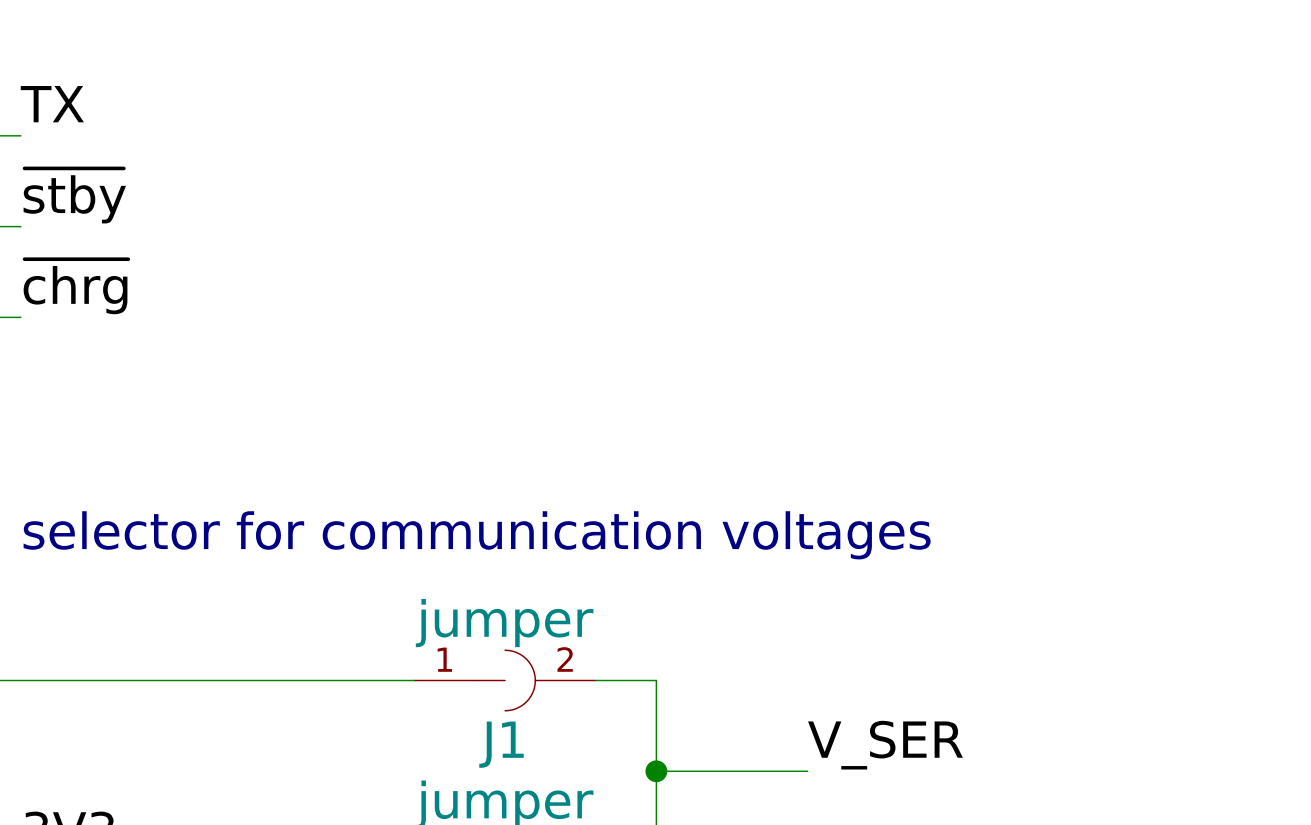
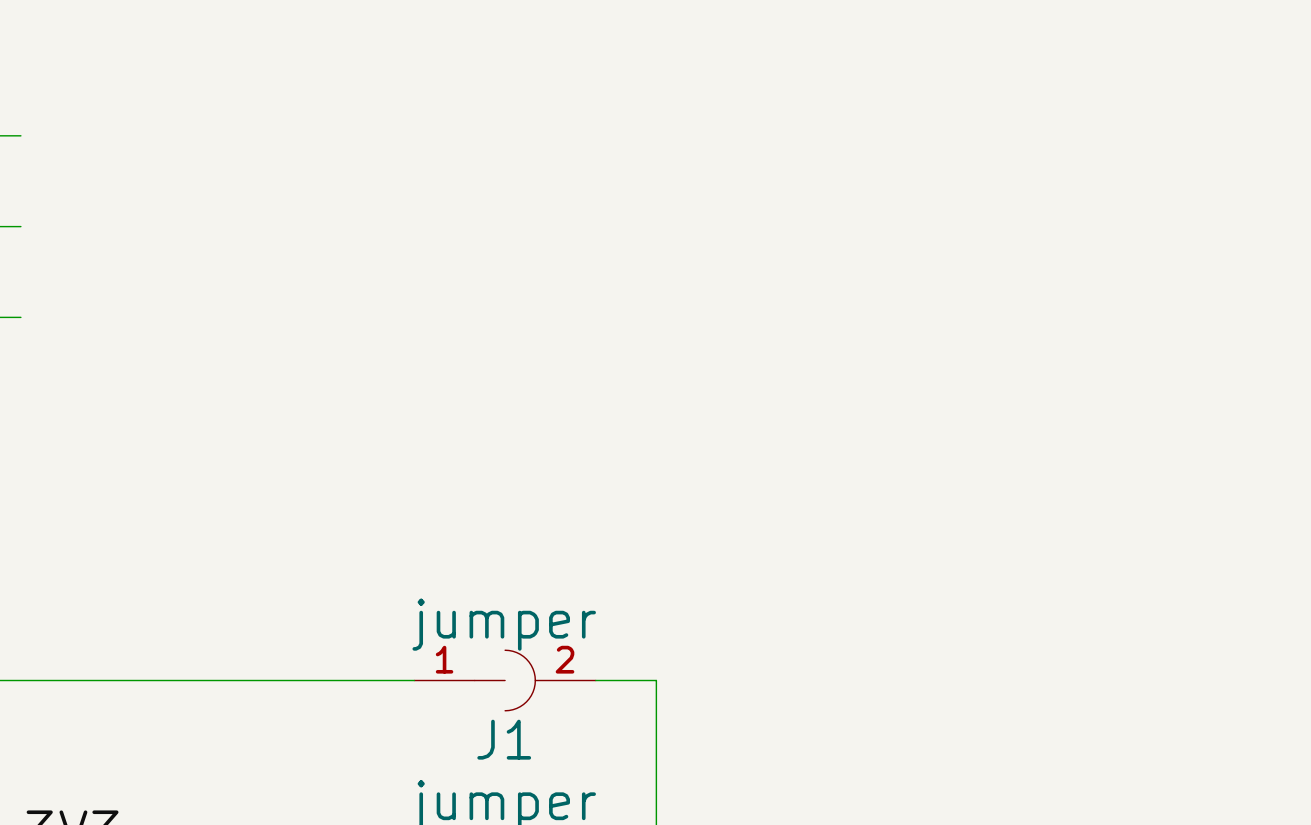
label: TX (52, 104) -> none
label: ~{stby} (74, 195) -> none
label: ~{chrg} (75, 286) -> none
text: selector for communication voltages (477, 535) -> none
label: V_SER (885, 745) -> none
wire: (656, 771) (807, 771) -> none
junction: (656, 771) -> none

